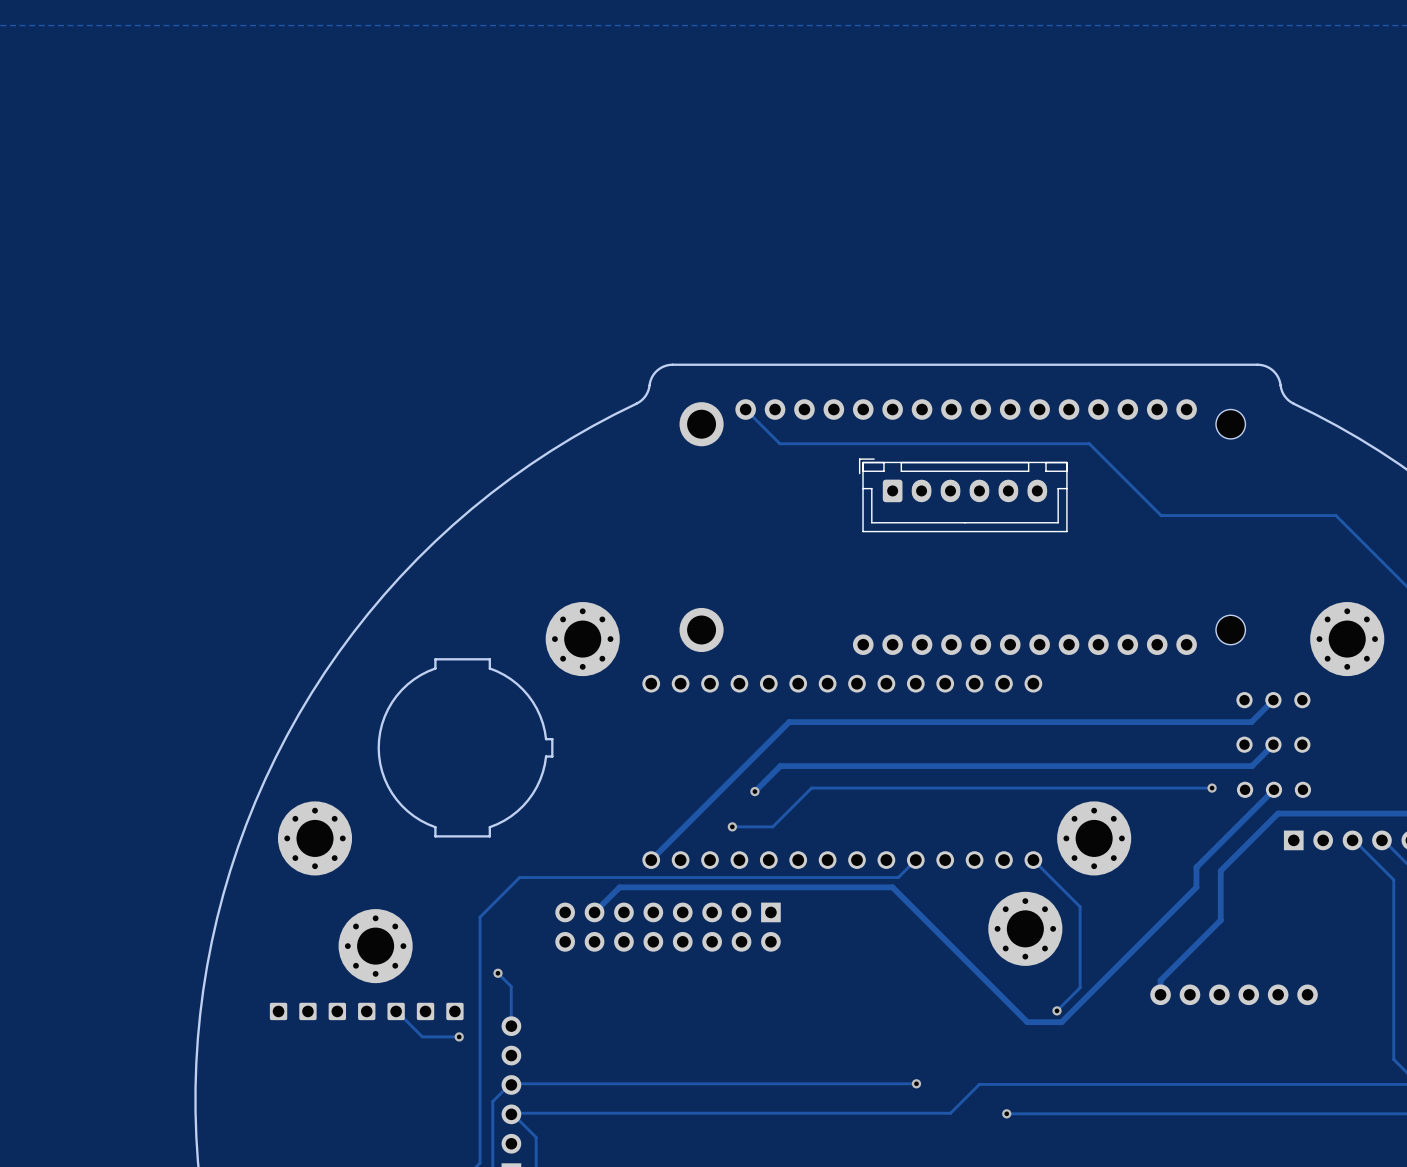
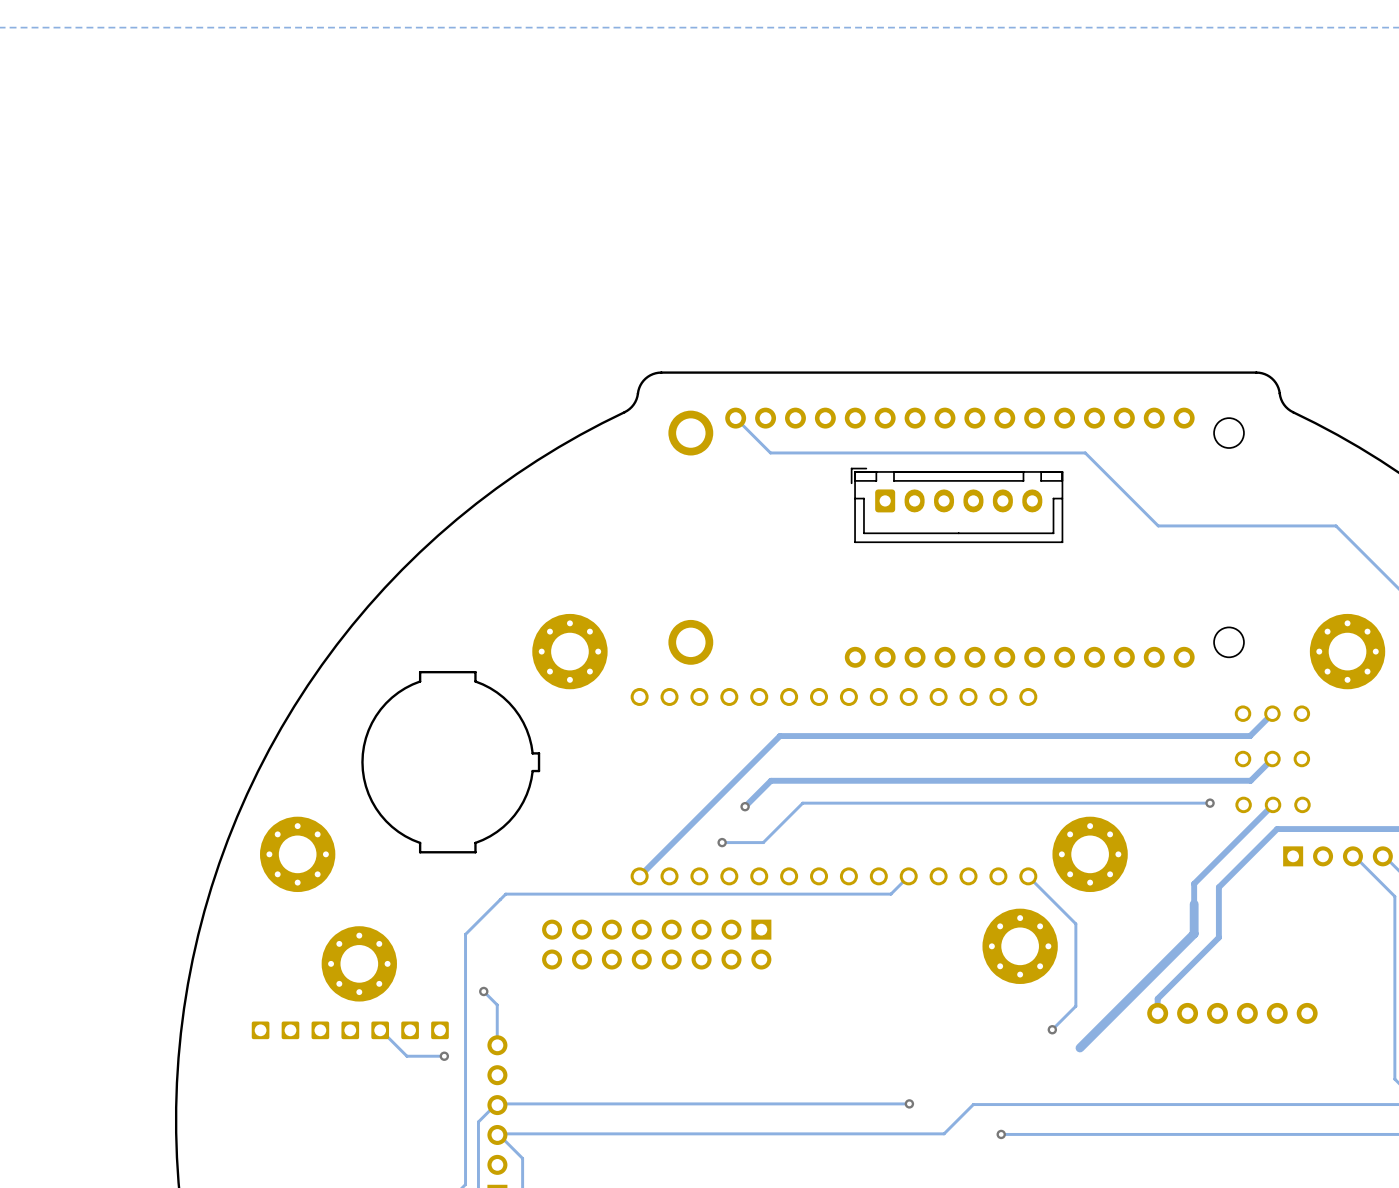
track: (1196, 887) (1061, 1022) (1027, 1022) (892, 887) (619, 887) (594, 912) -> (1194, 904) (1194, 933) (1079, 1047)

